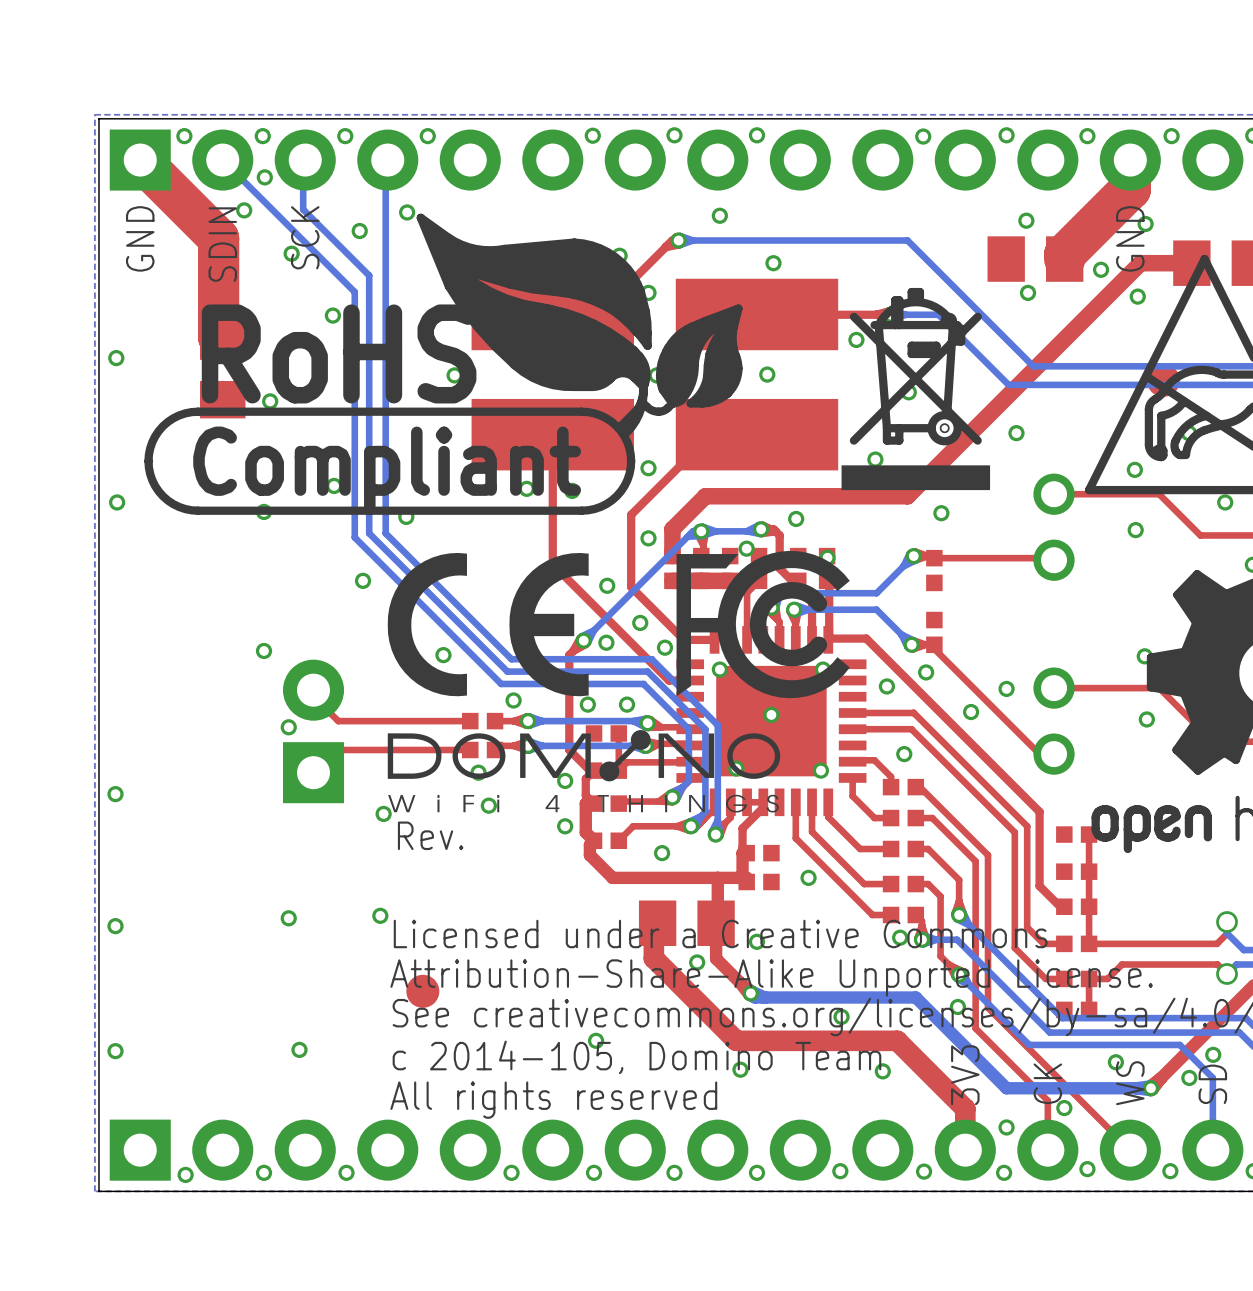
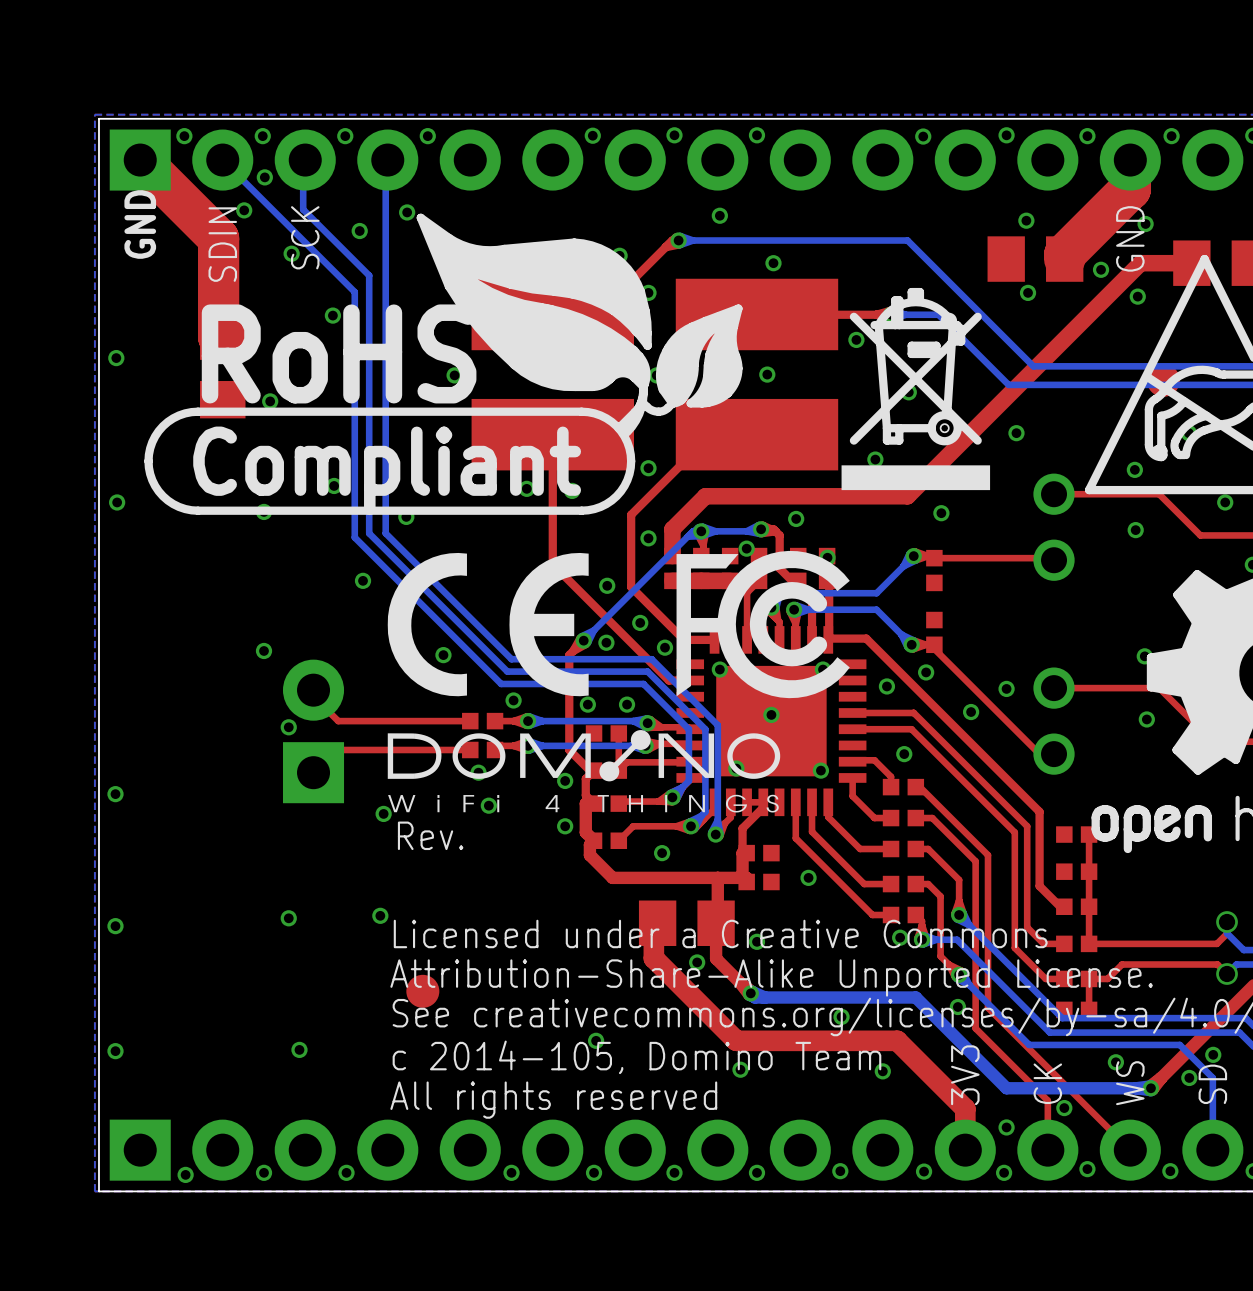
text position: GND (140, 238) -> GND (140, 224)

